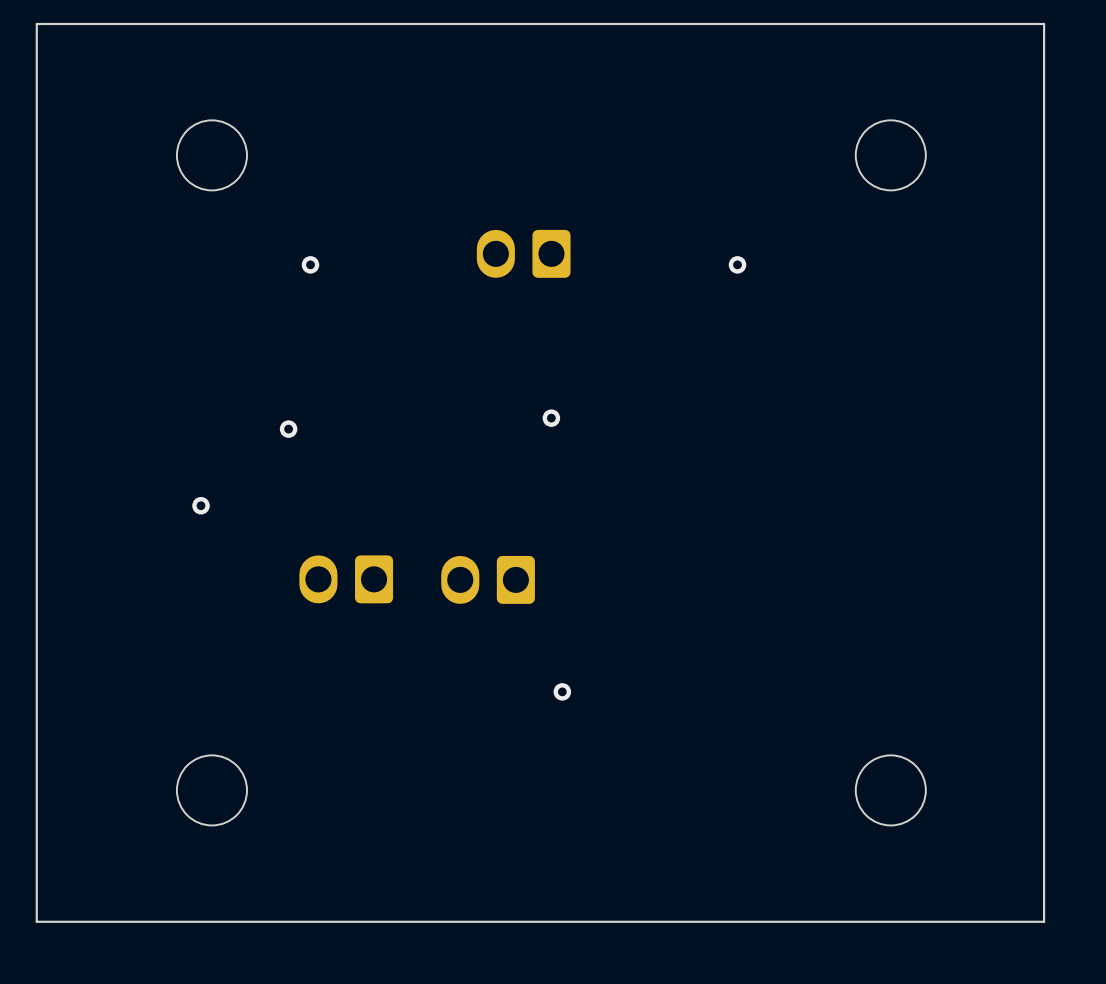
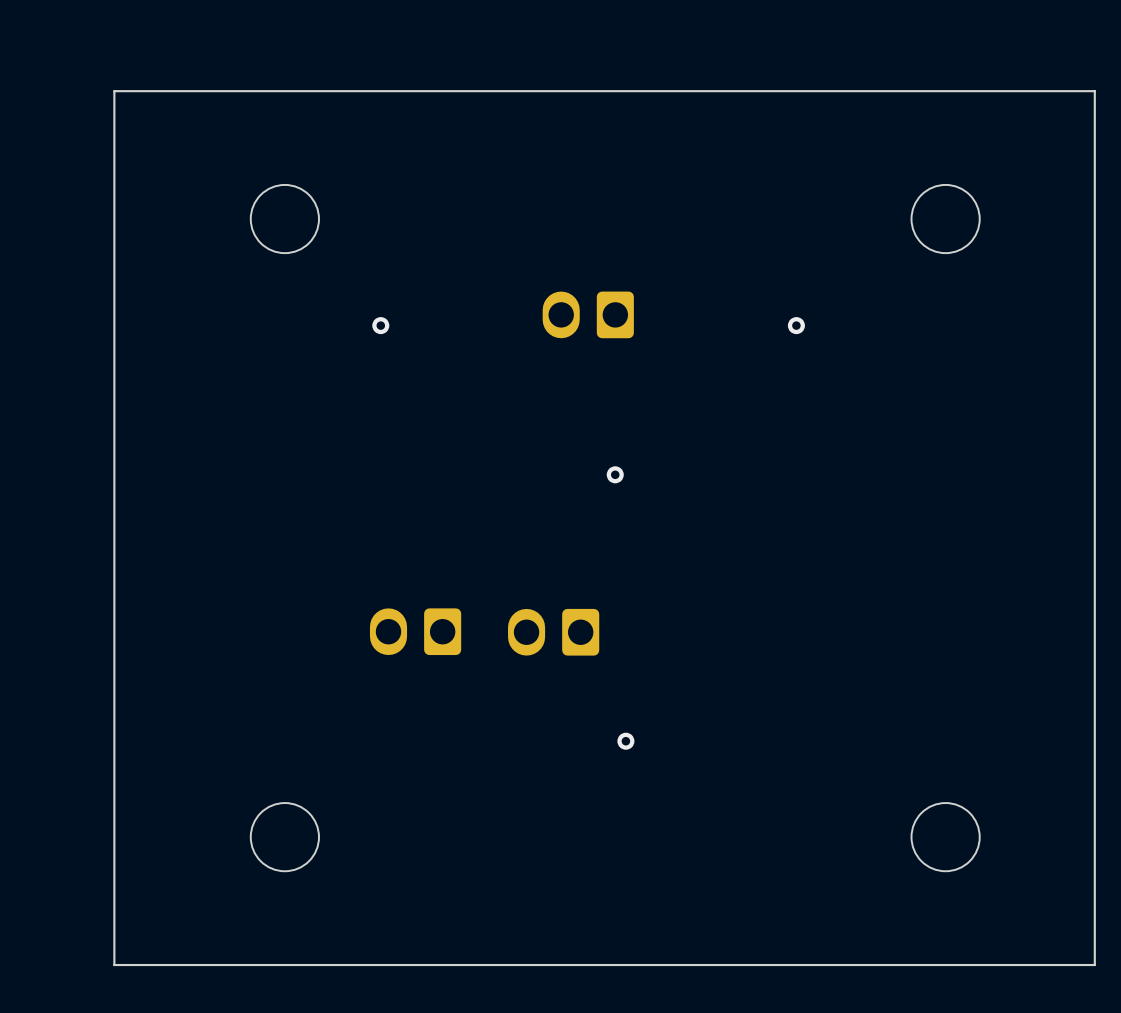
via: (288, 429) -> none
via: (201, 505) -> none

